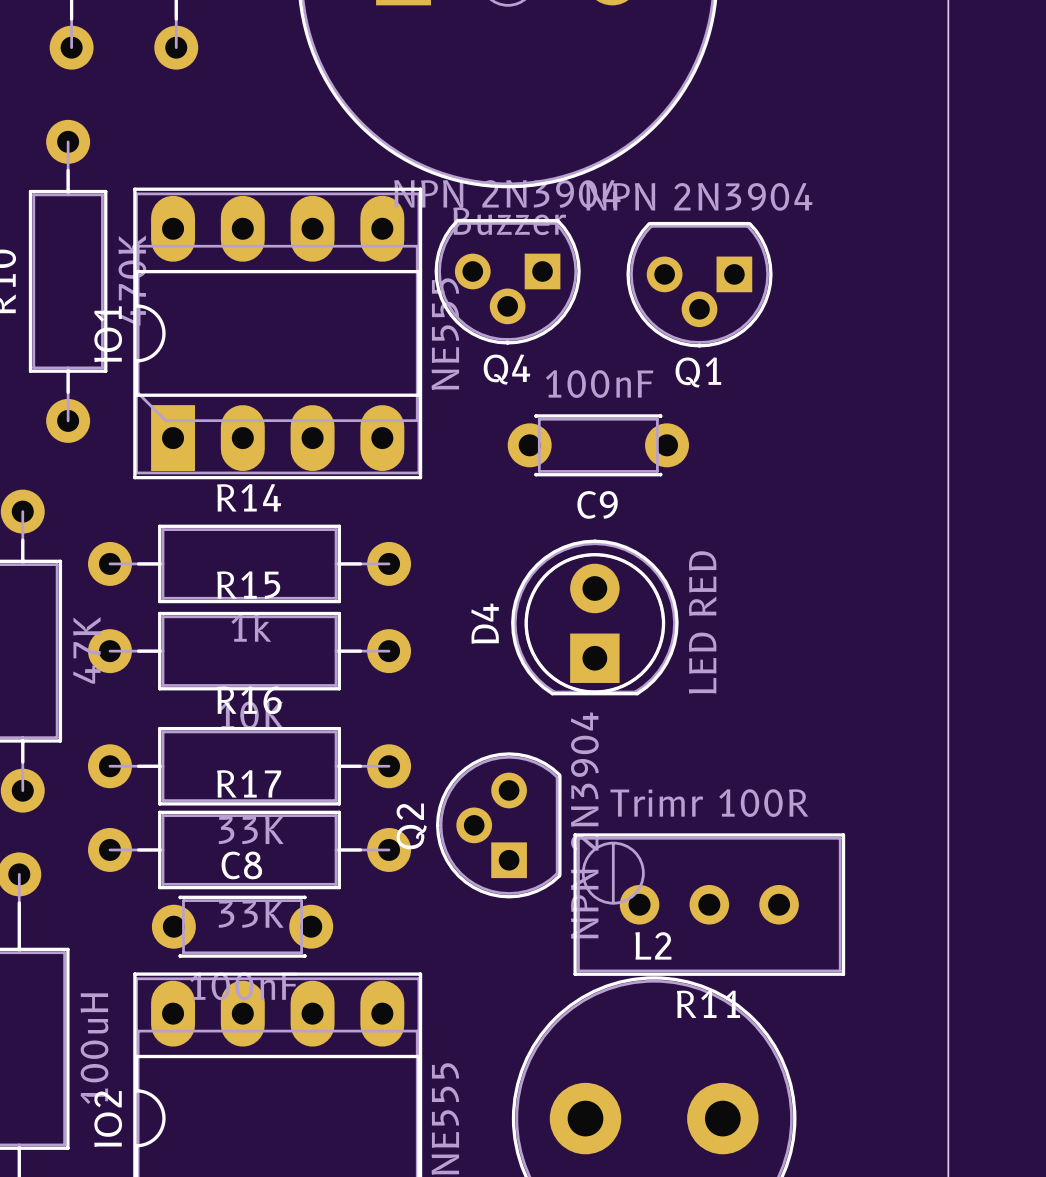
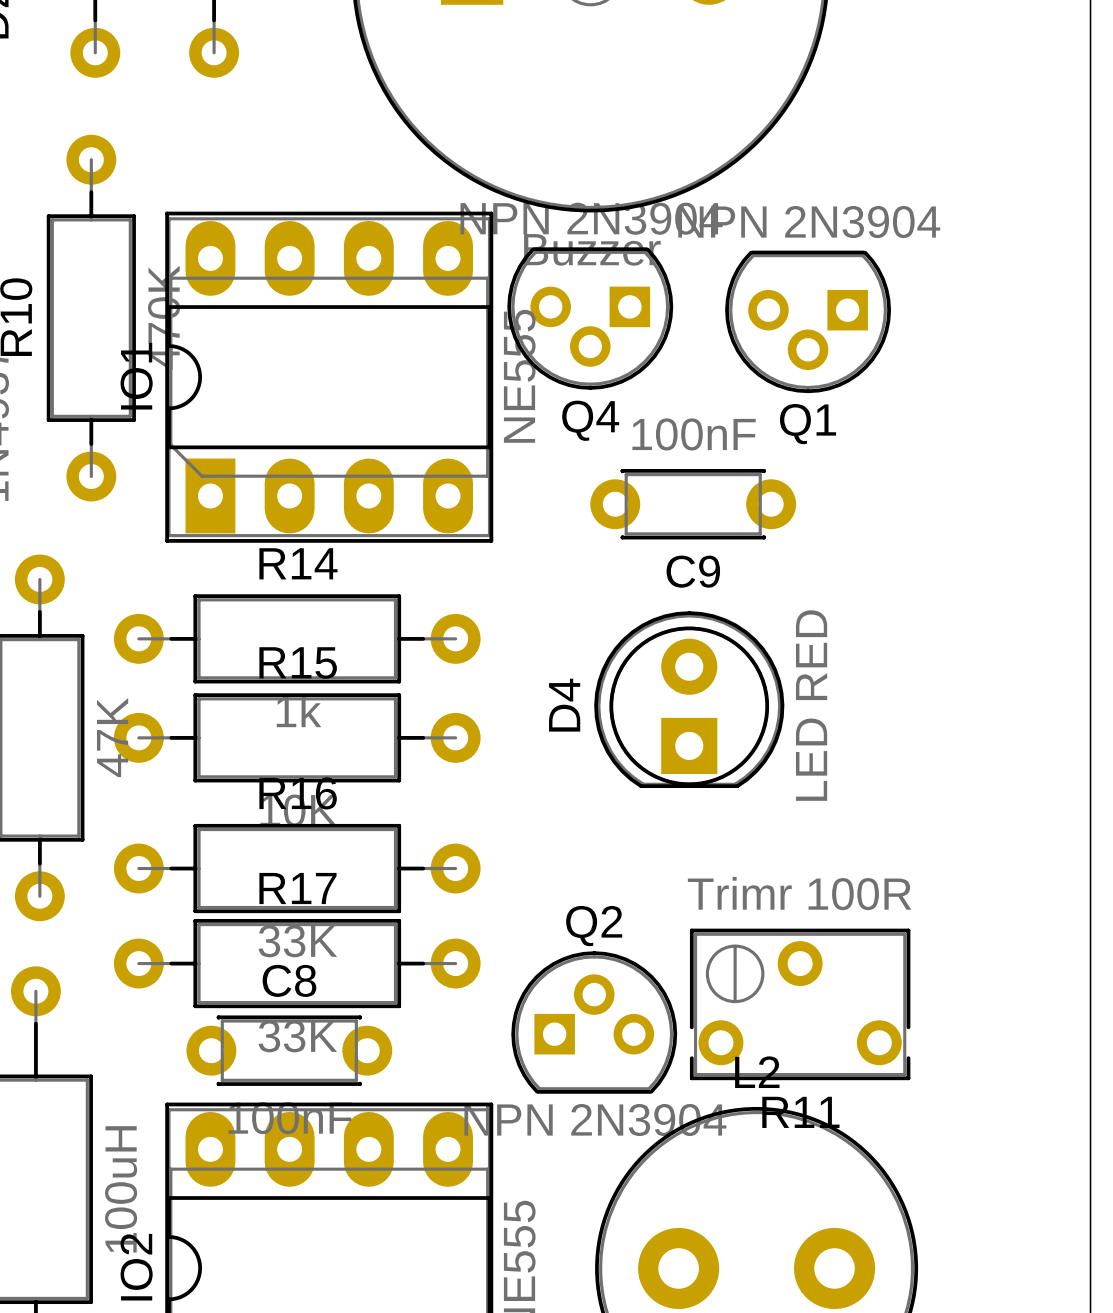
Q2 rotation: 0° (498, 825) -> 90° clockwise (594, 1022)
R11 footprint: [573, 833, 846, 976] -> [689, 928, 911, 1081]

